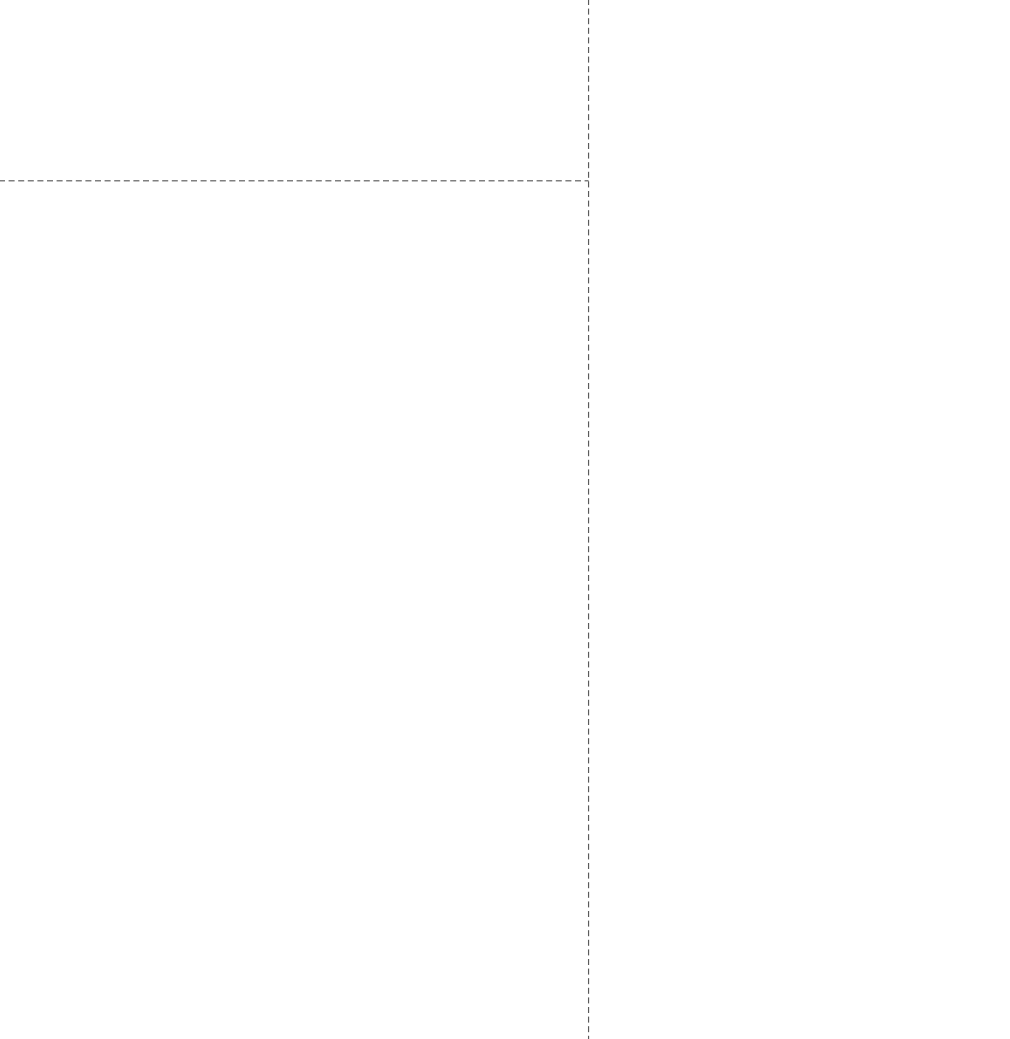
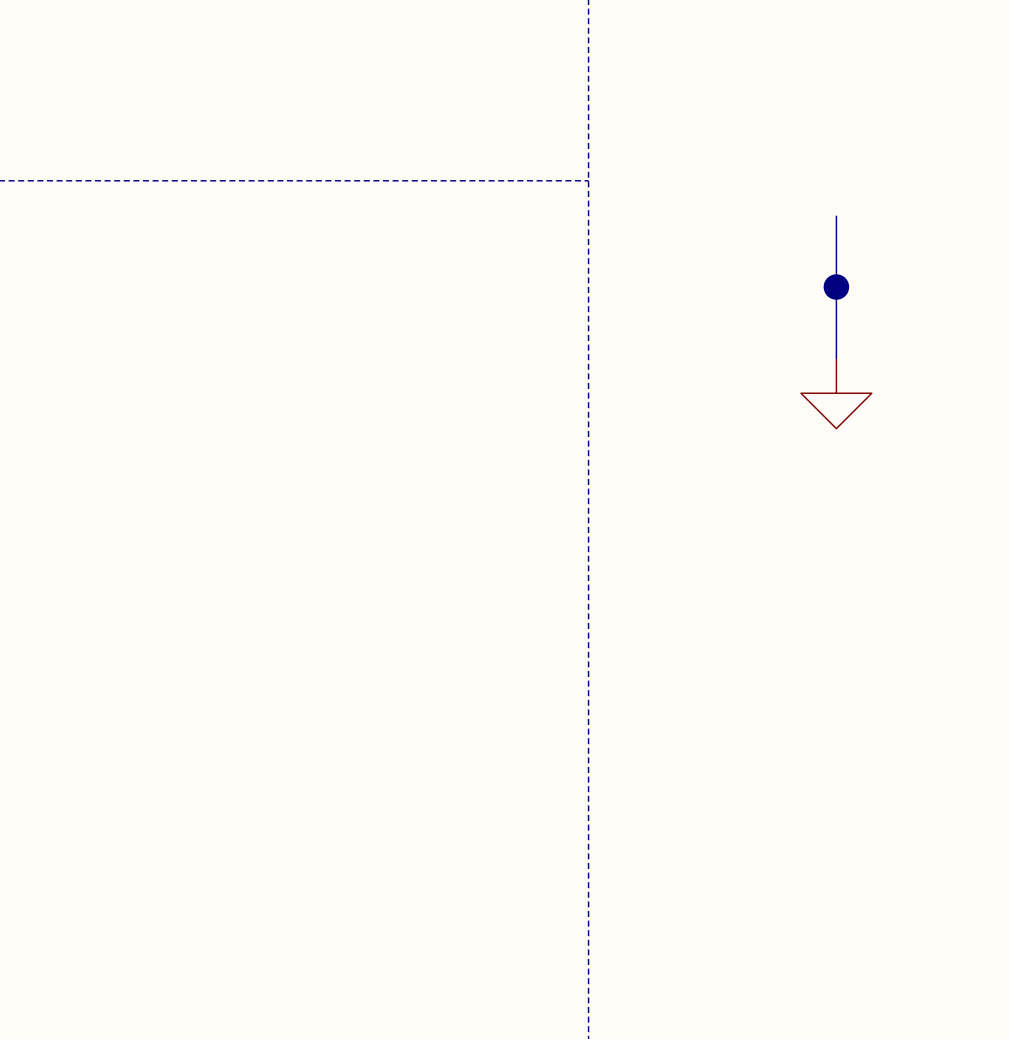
wire: none -> (836, 216) (836, 357)
junction: none -> (836, 287)
power symbol: none -> (836, 393)

